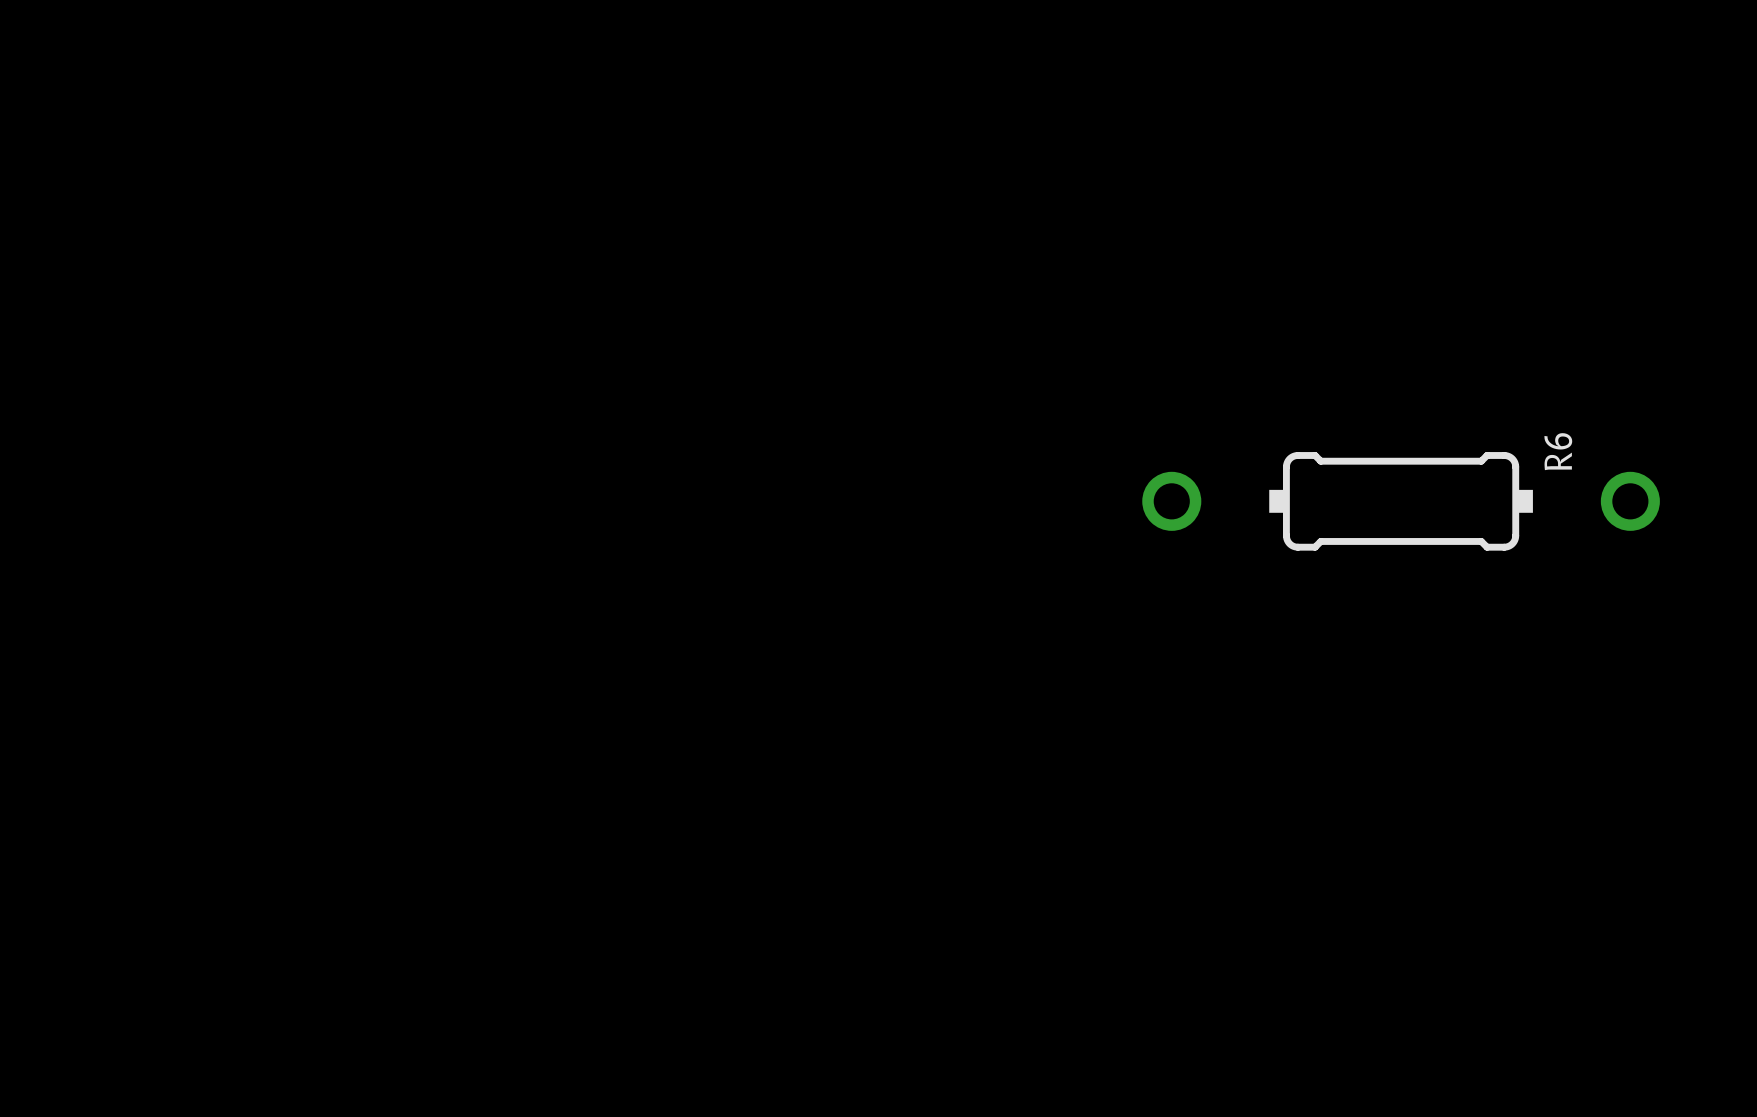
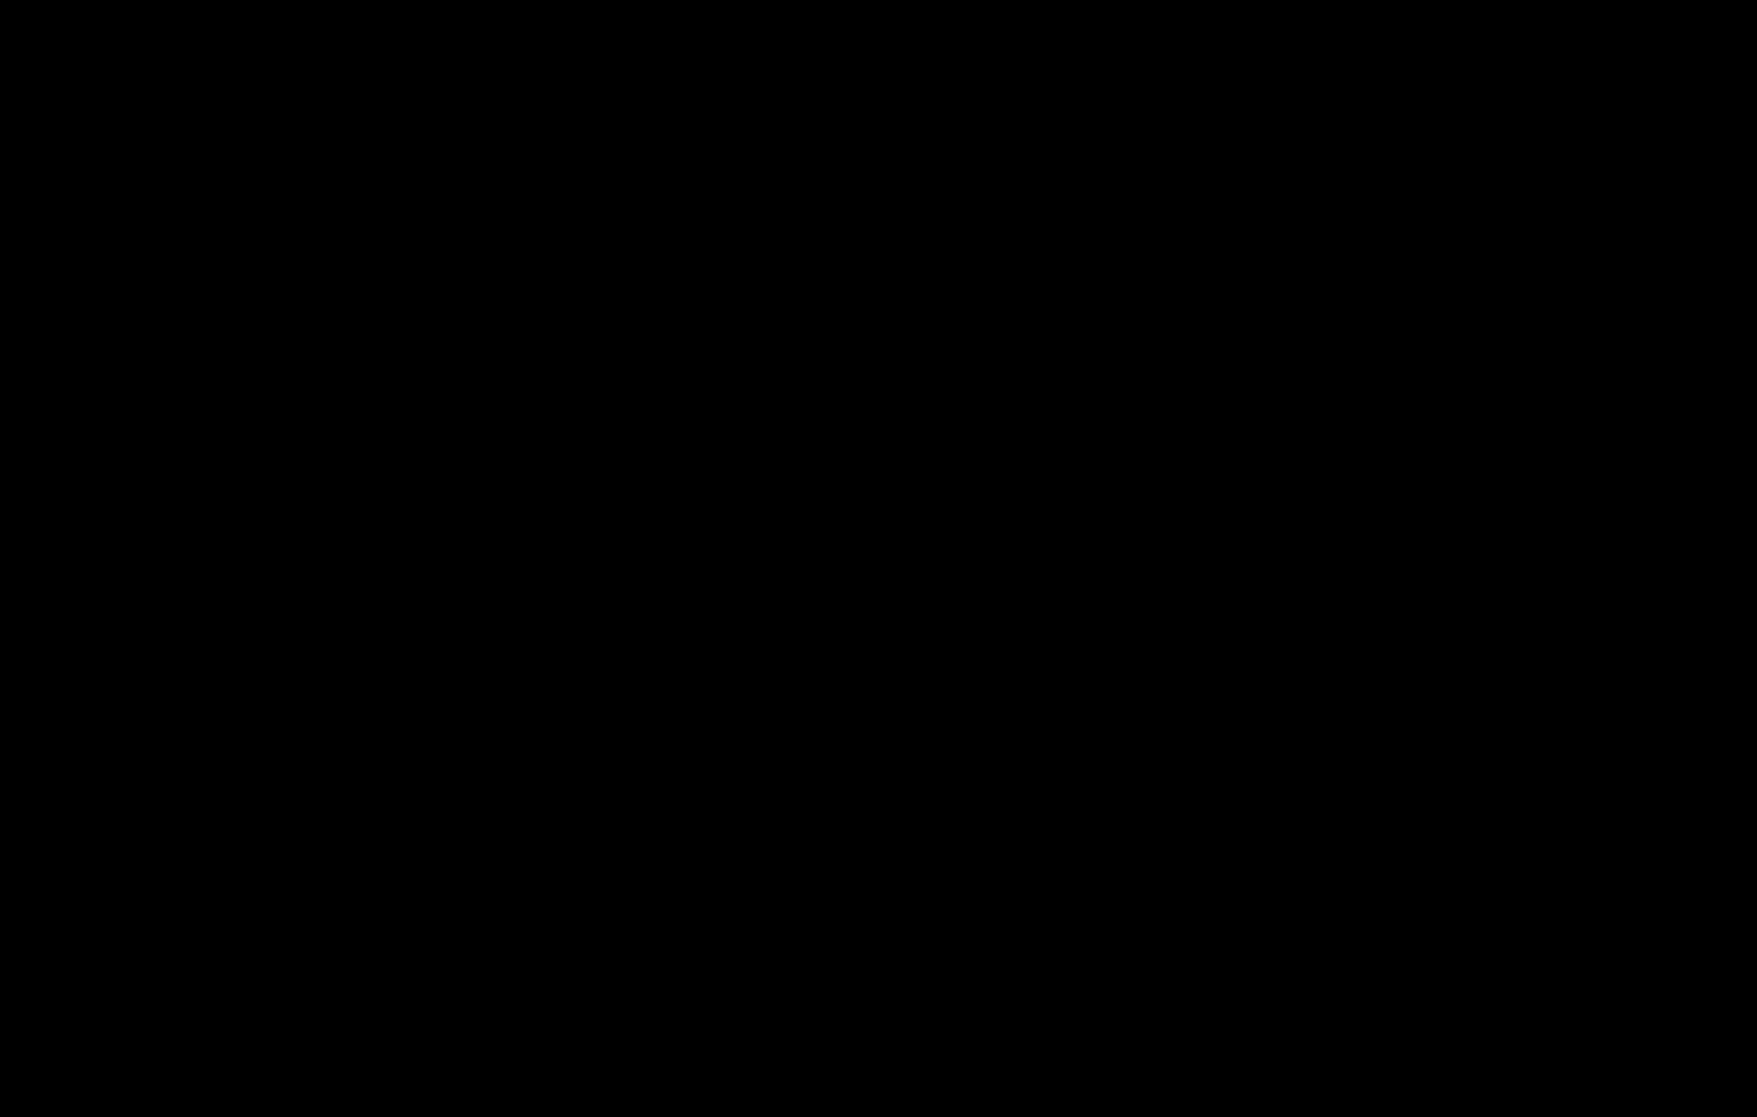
R6: (1401, 501) -> none

